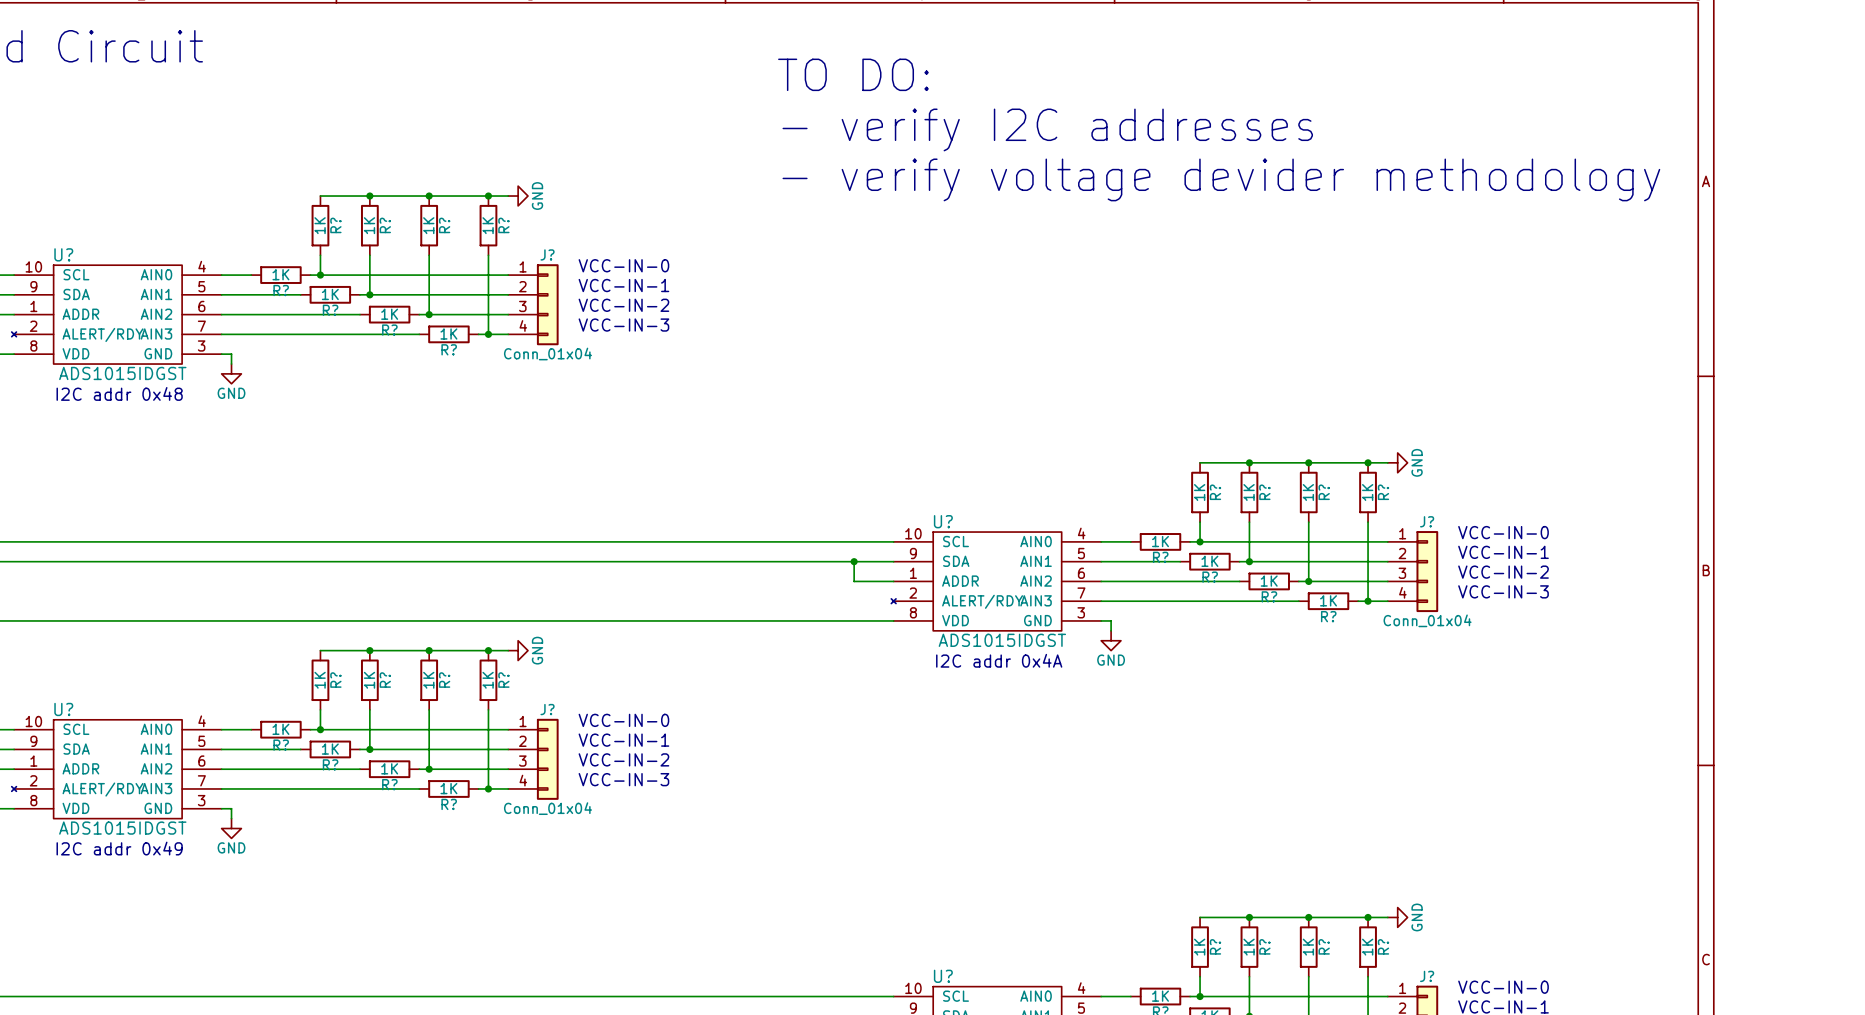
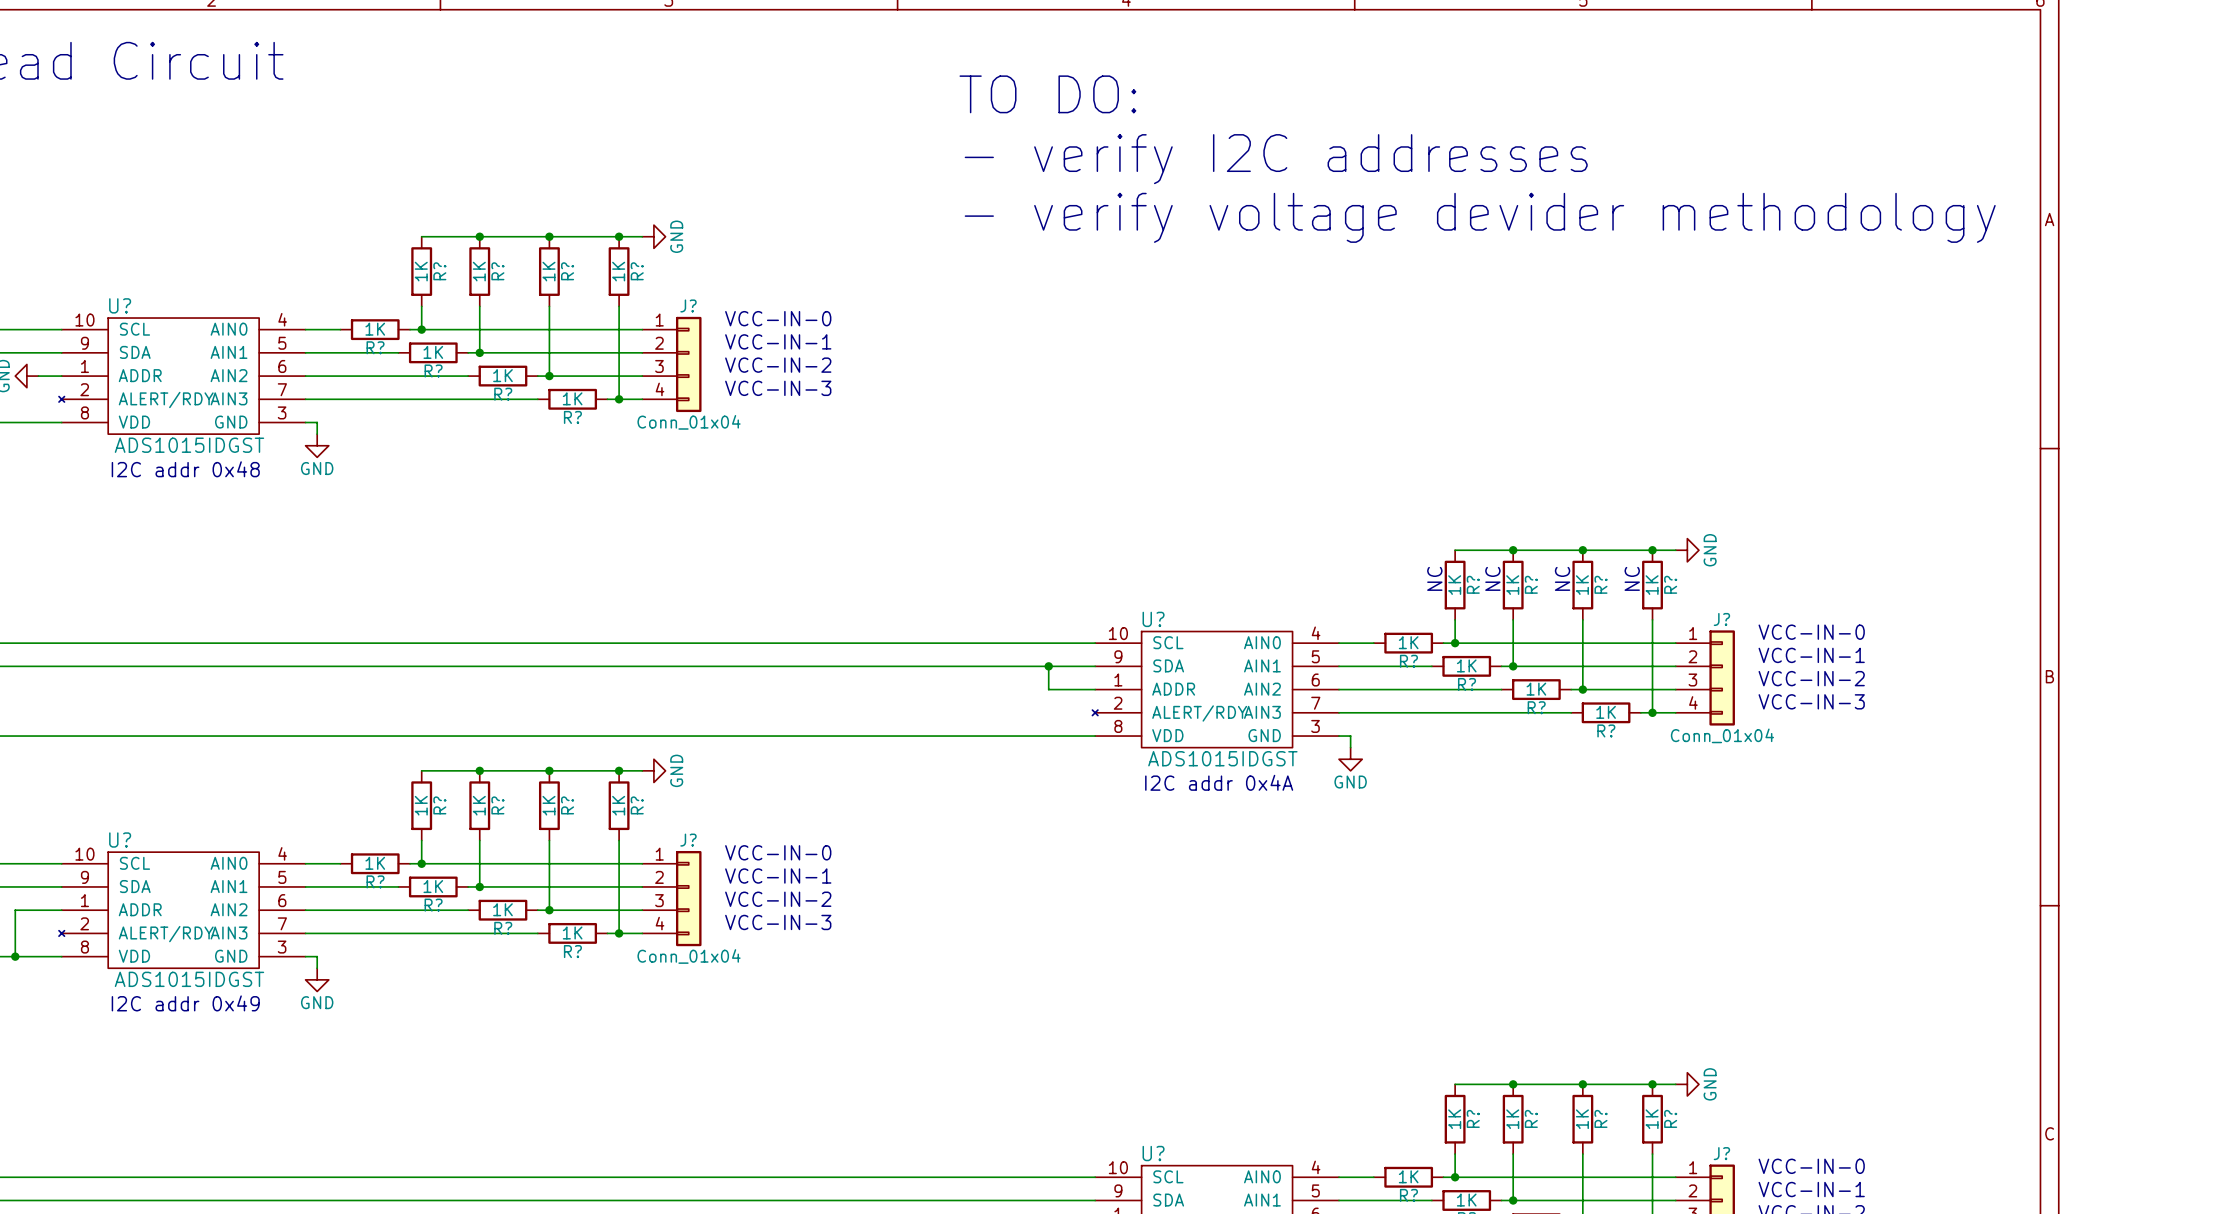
text: none -> NC (1434, 578)
text: none -> NC (1492, 578)
text: none -> NC (1562, 578)
text: none -> NC (1632, 578)

